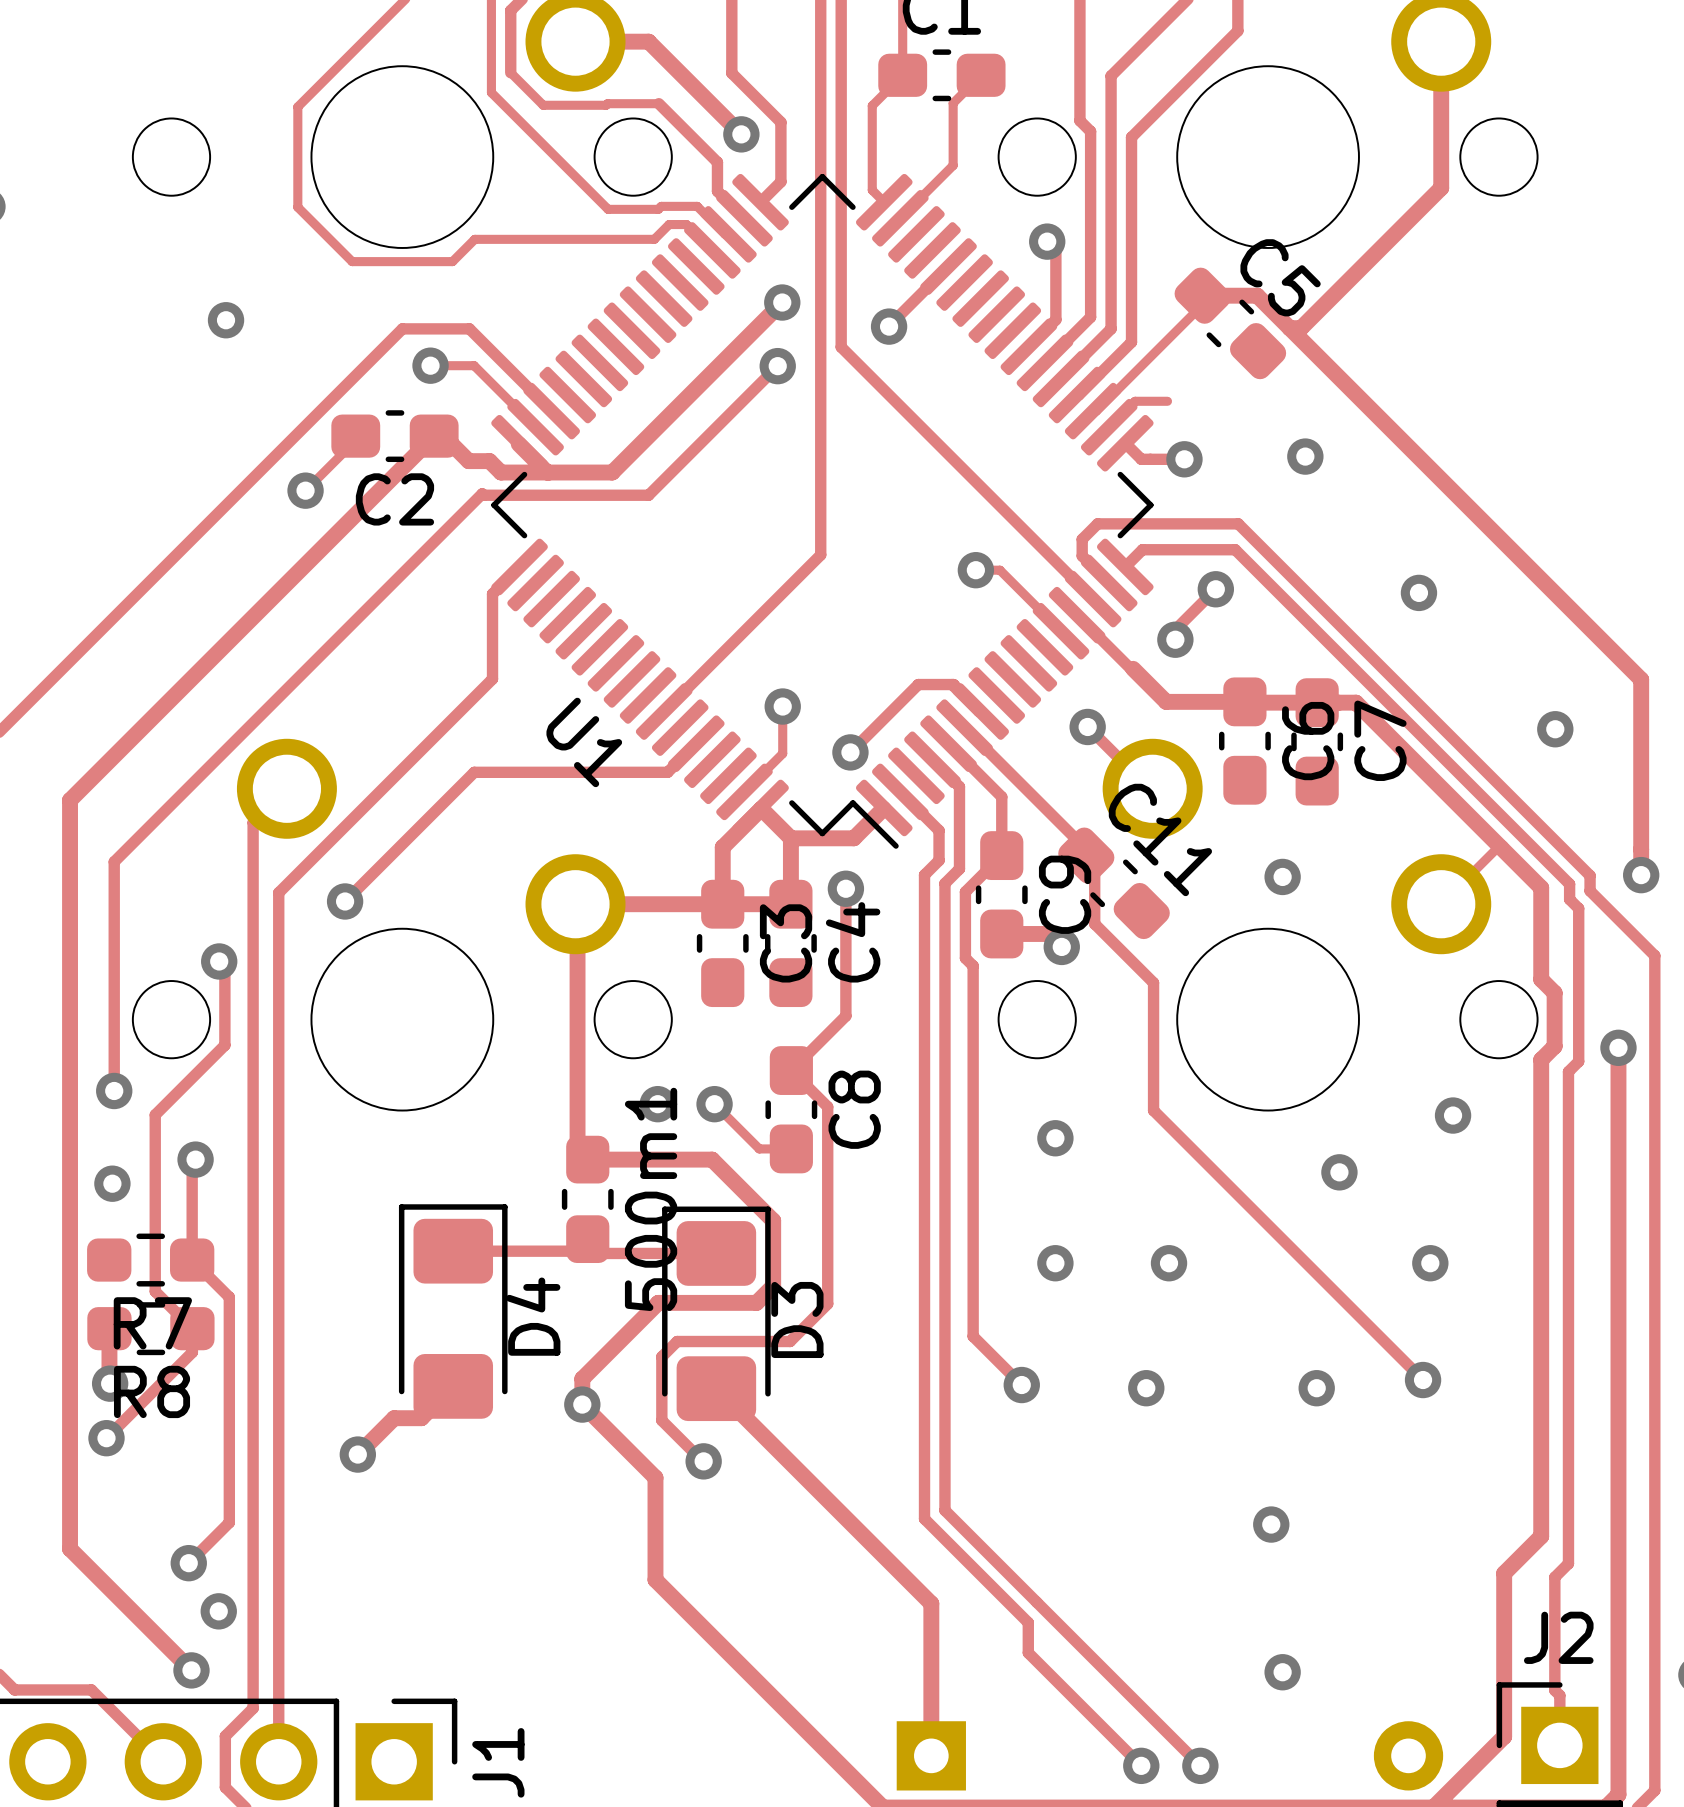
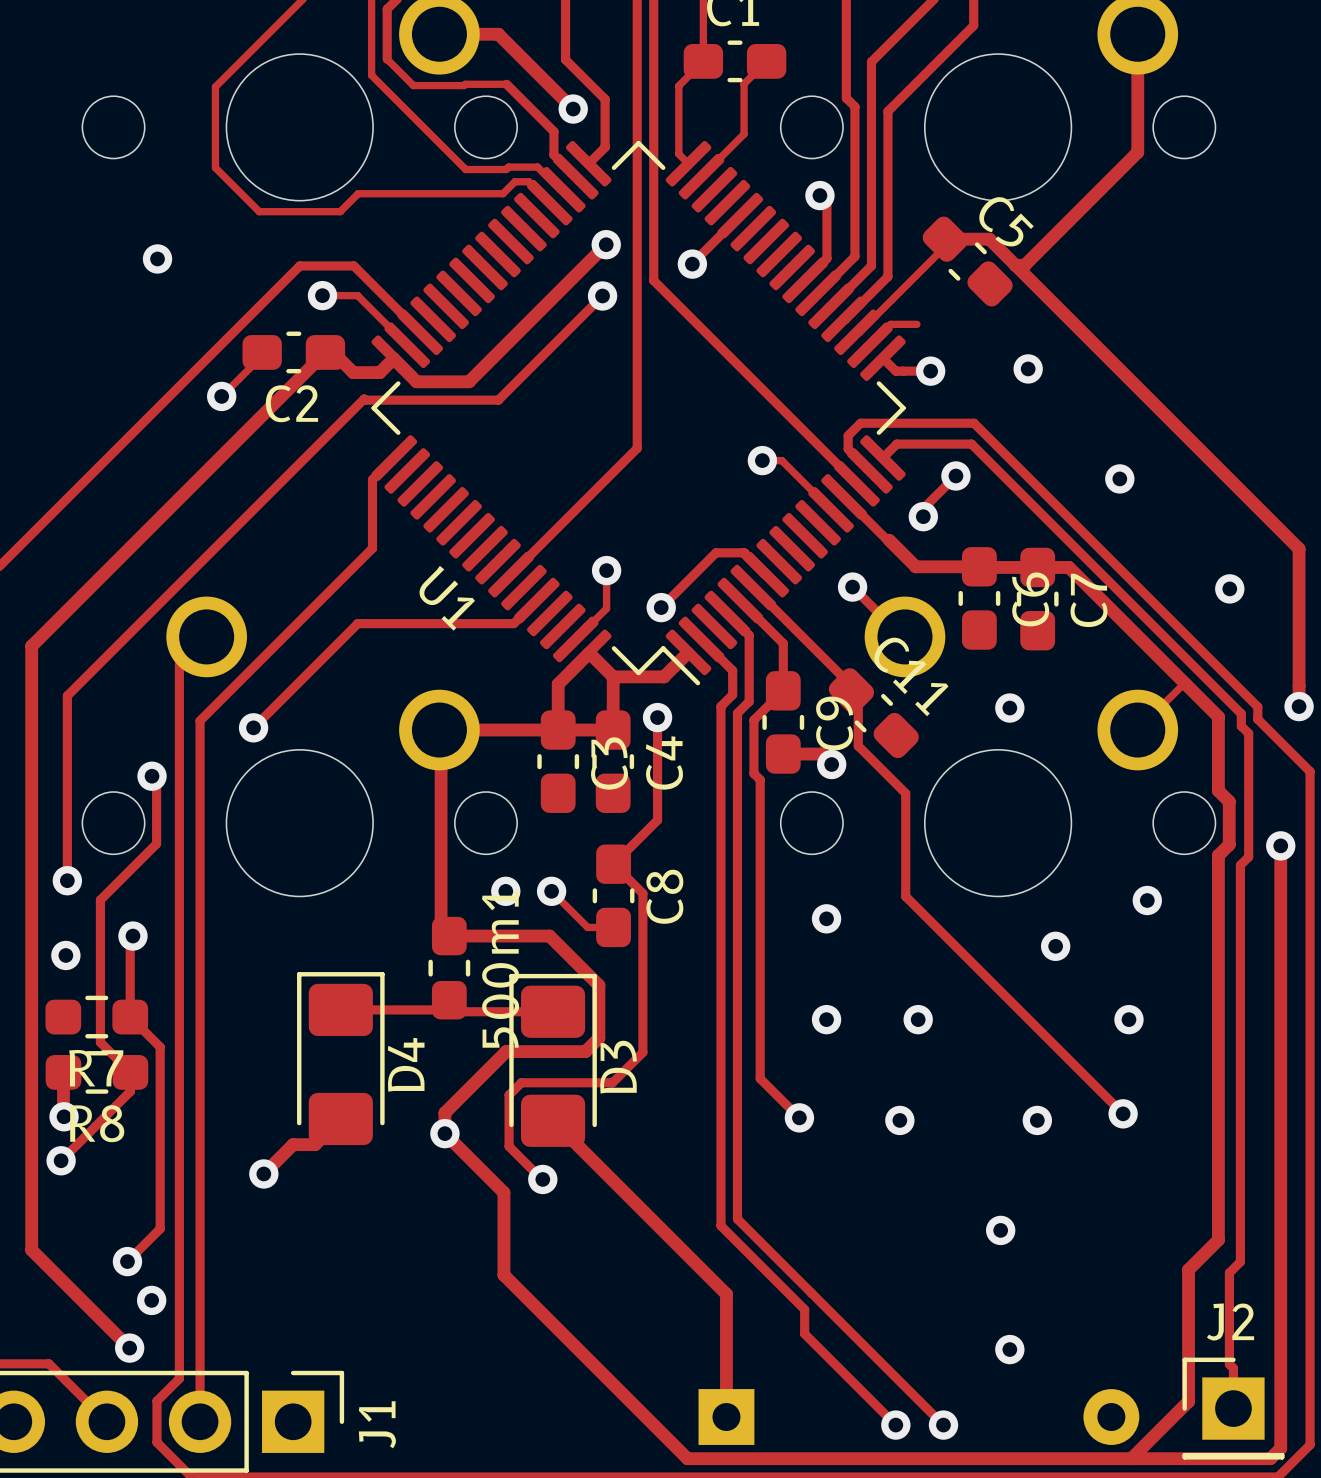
track: (489, 461) (501, 472) (547, 472) -> (370, 372) (379, 372) (393, 358)

